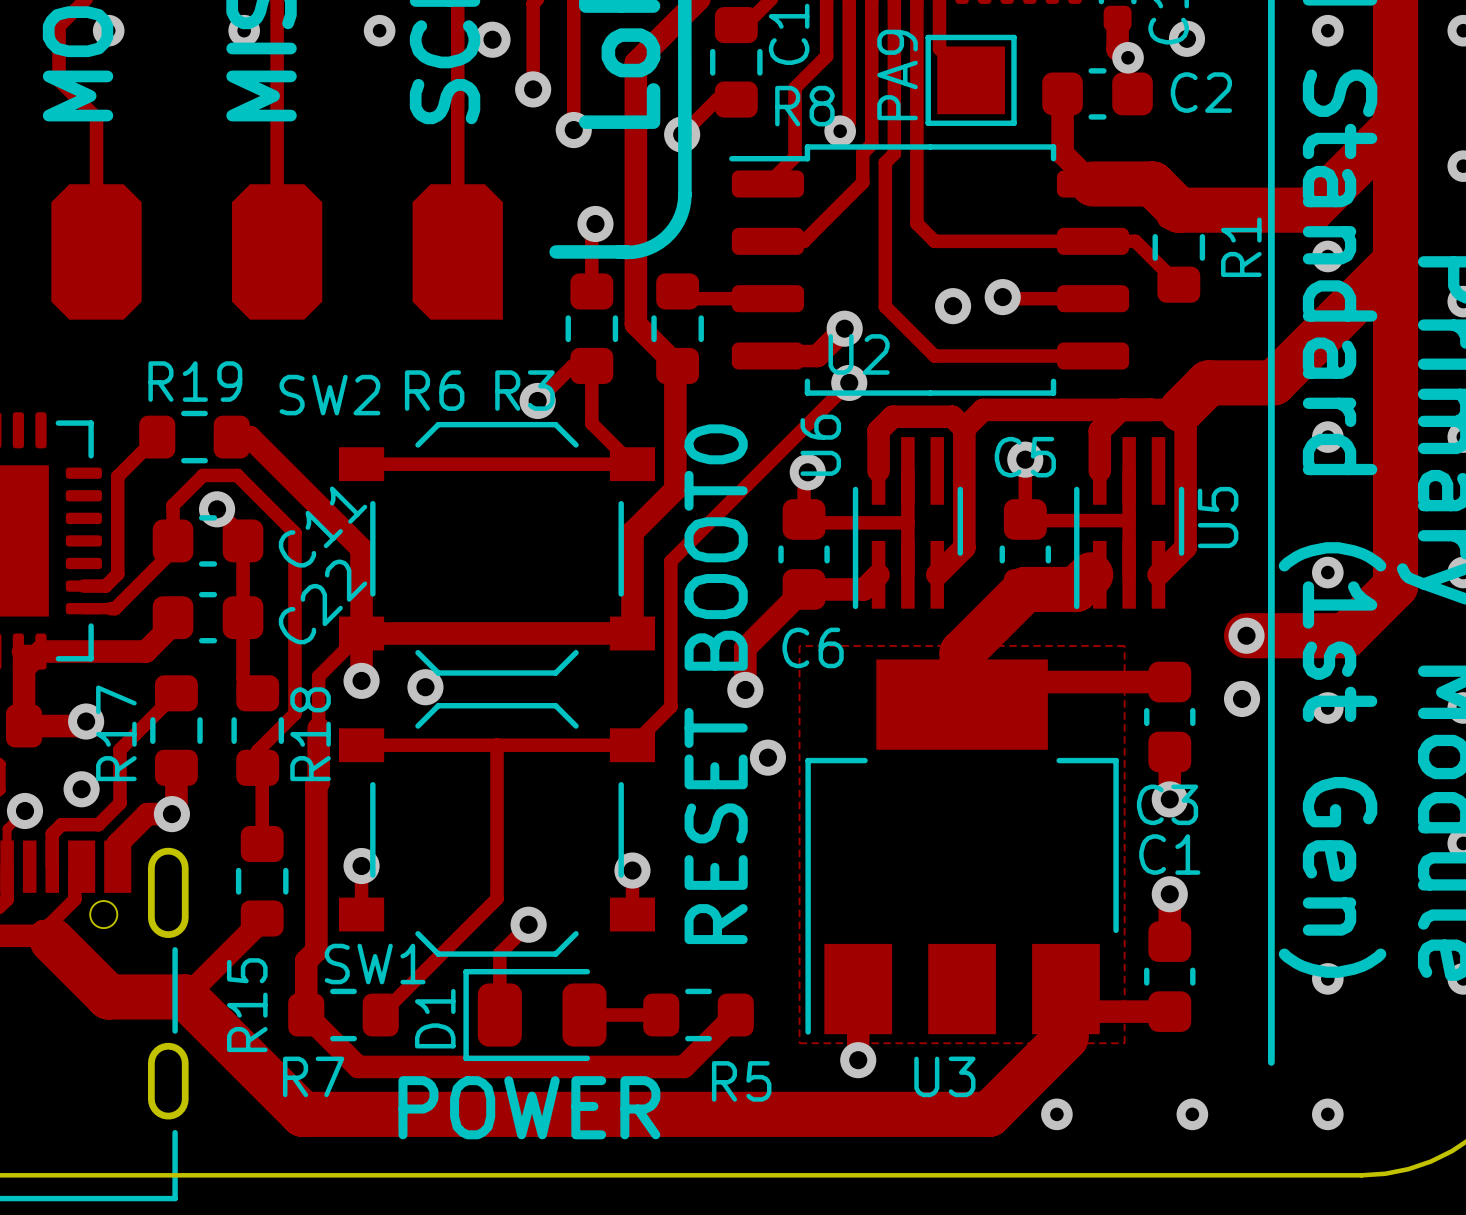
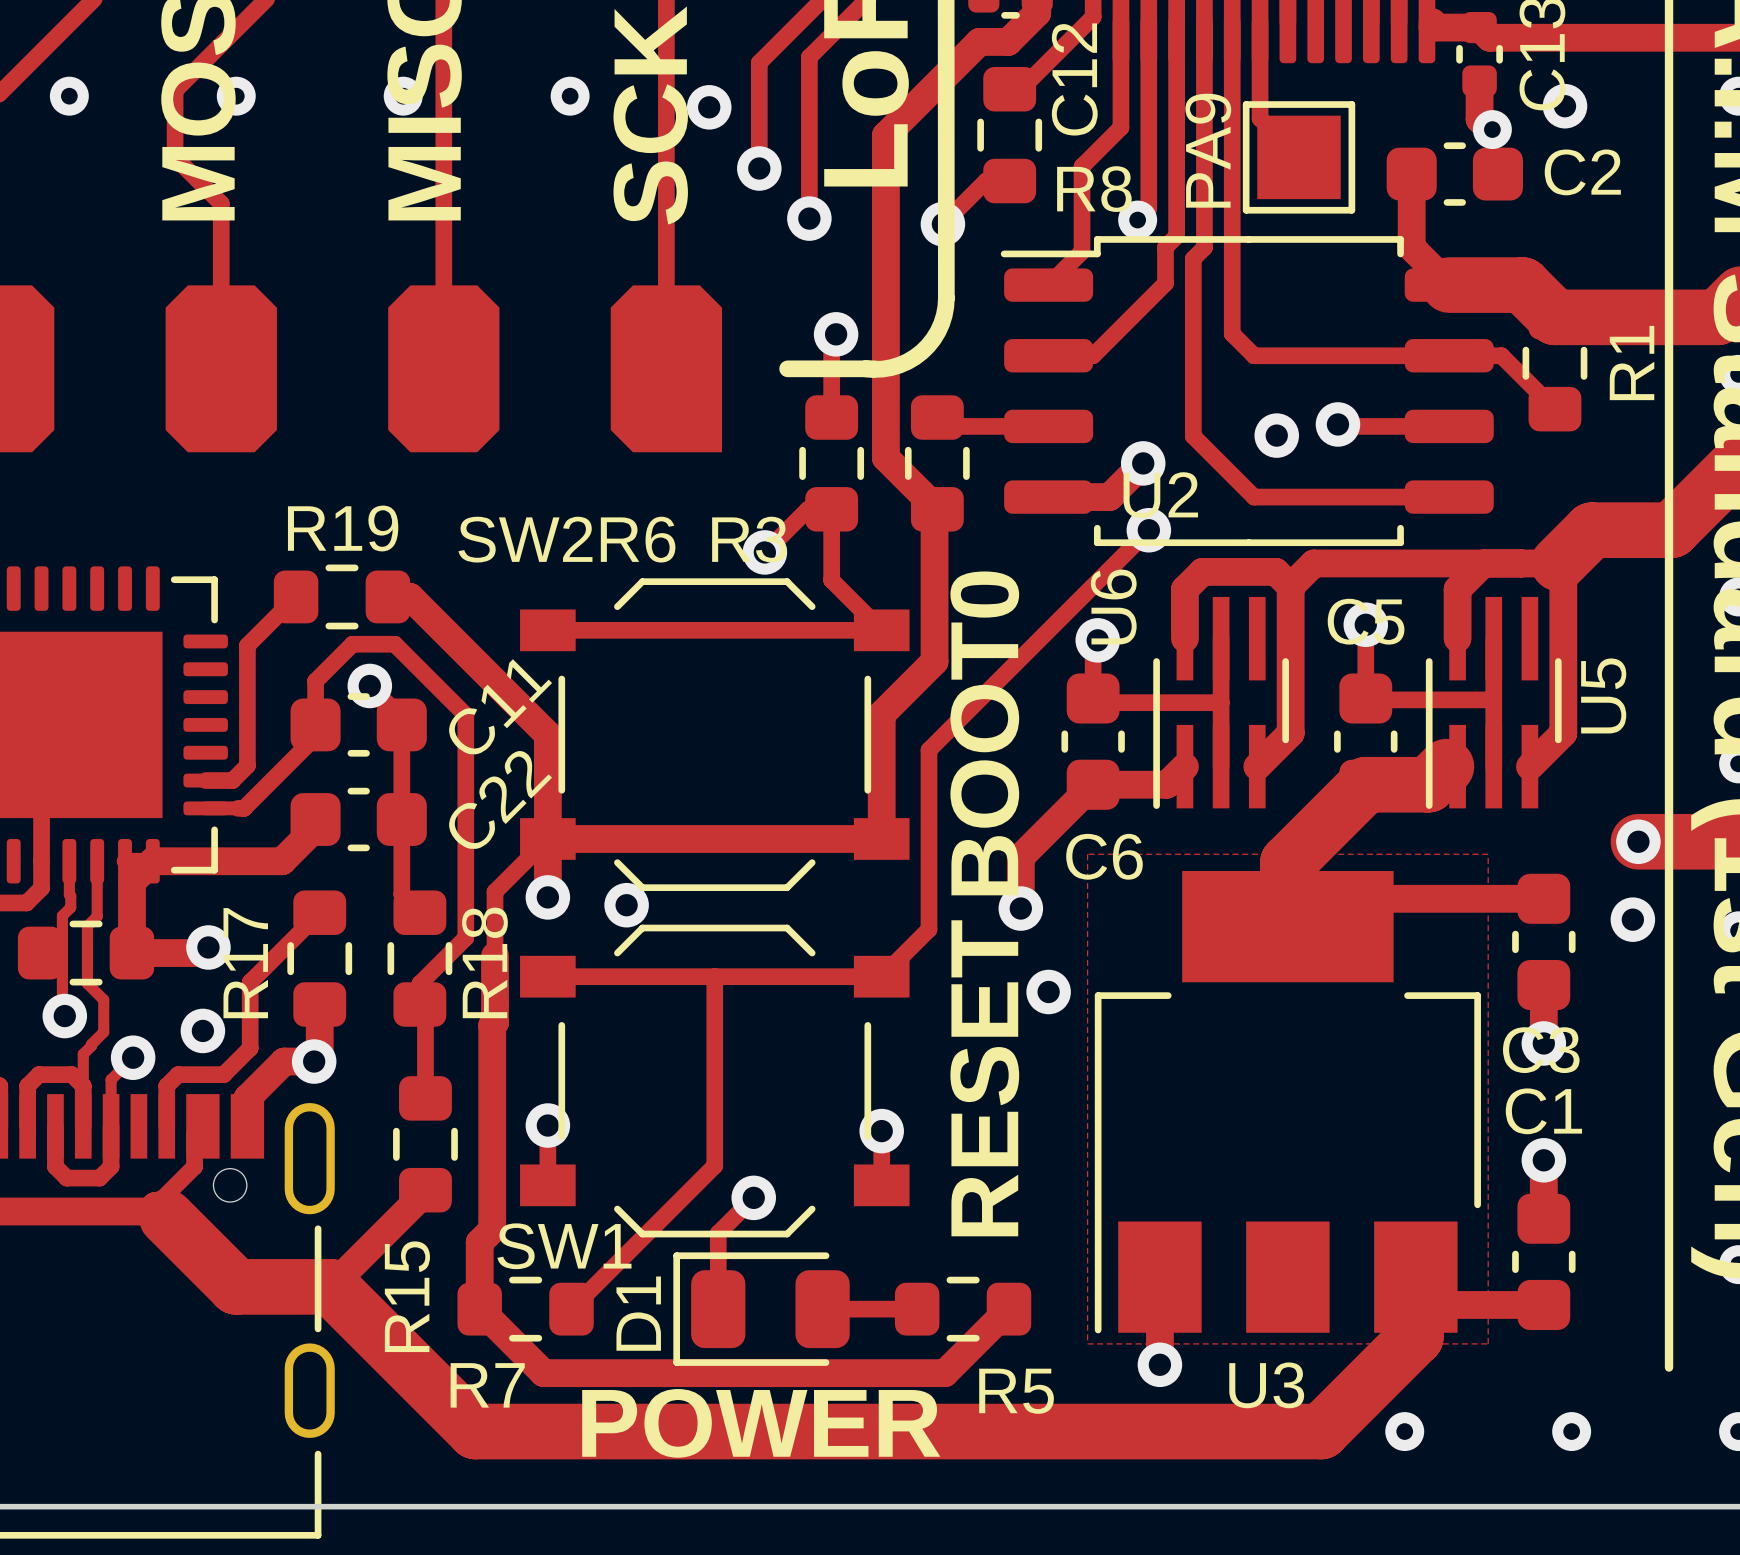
SW2 name position: SW2 (329, 395) -> SW2 (525, 539)

